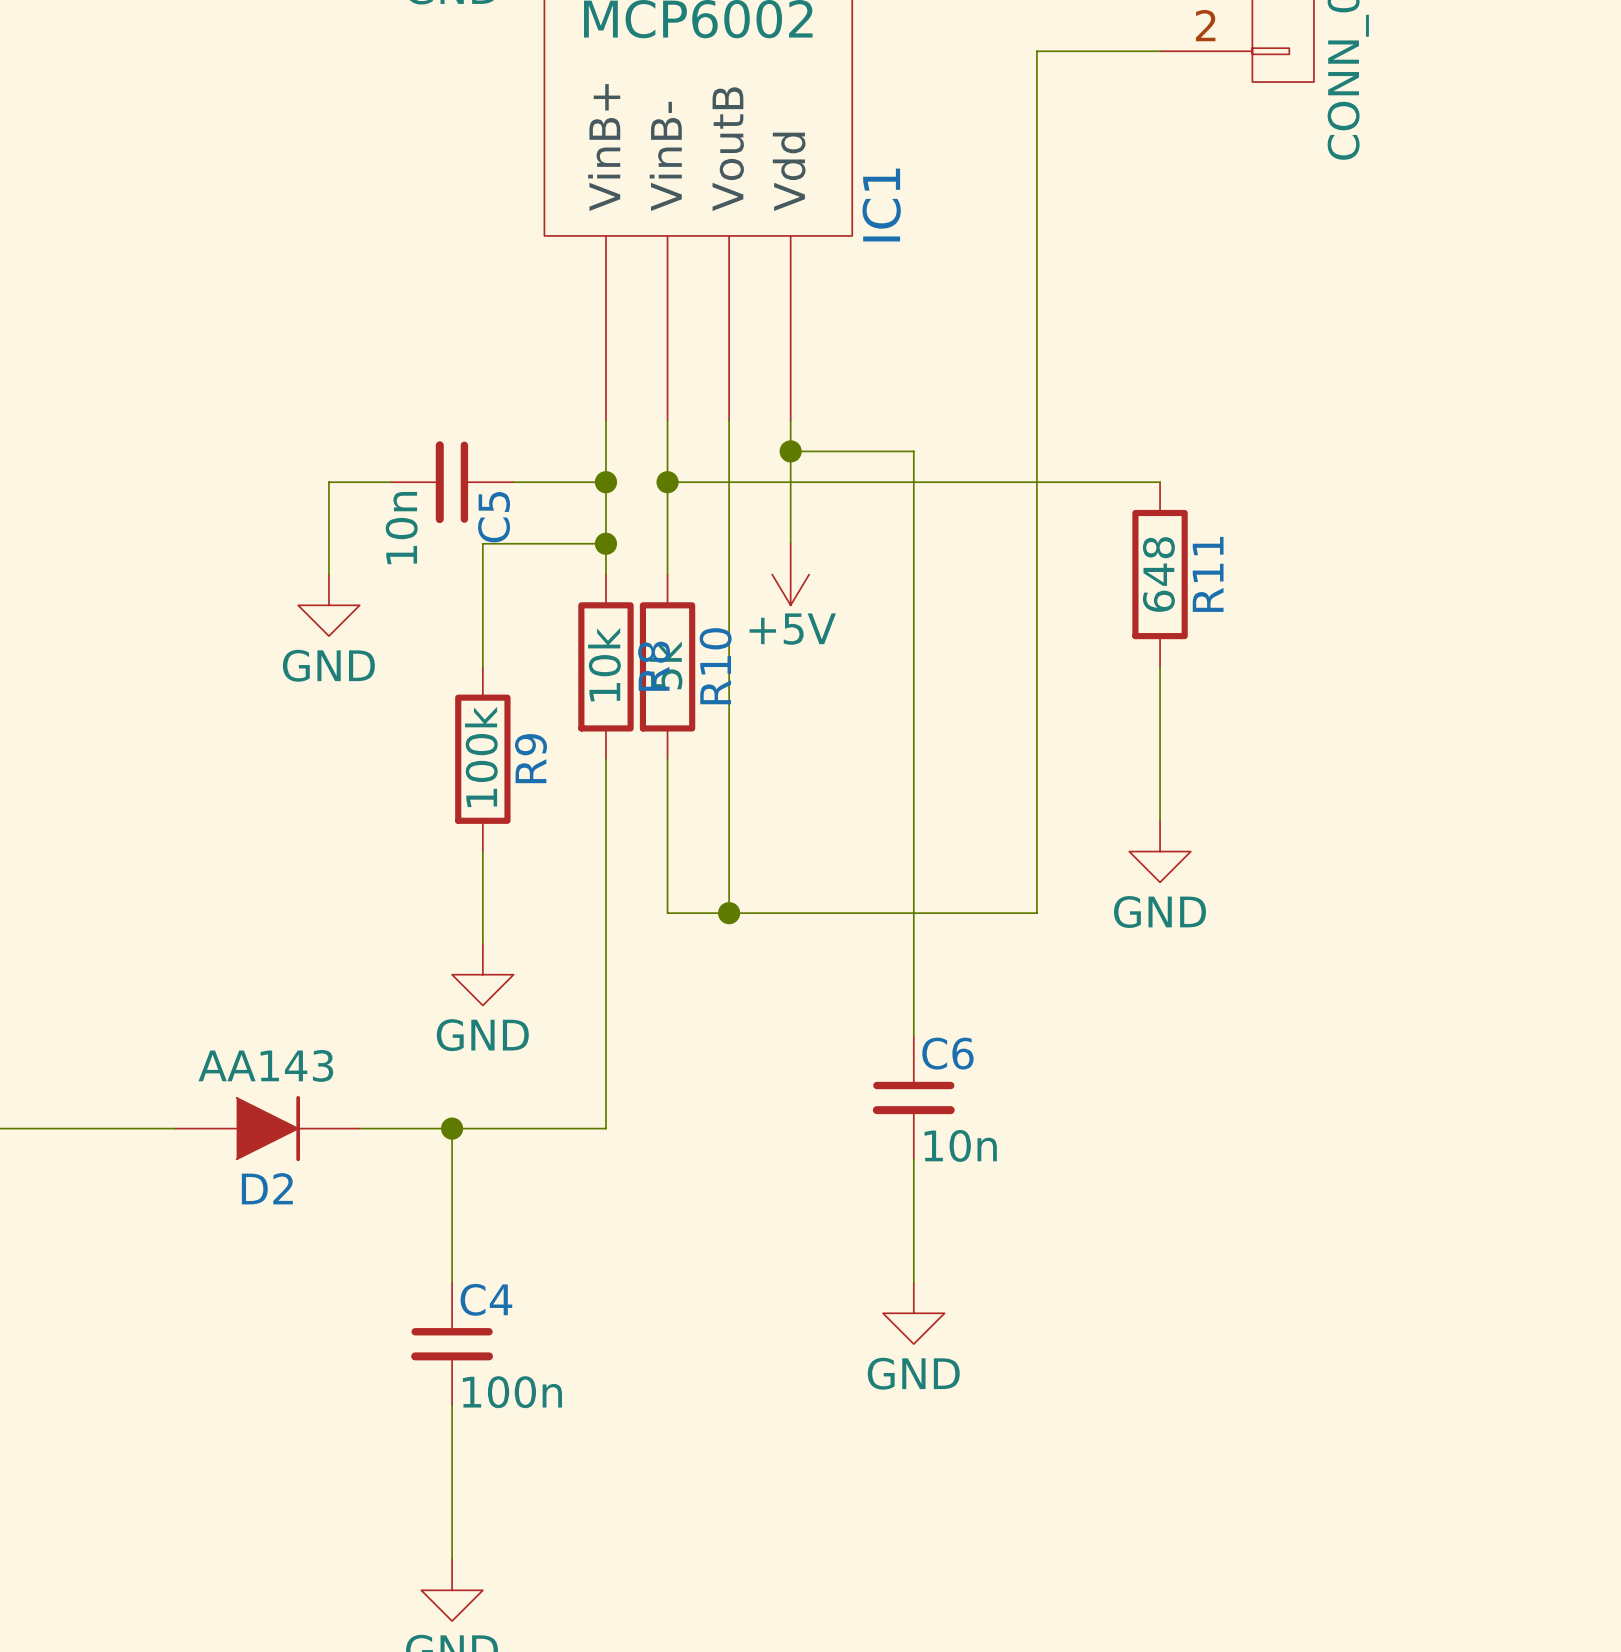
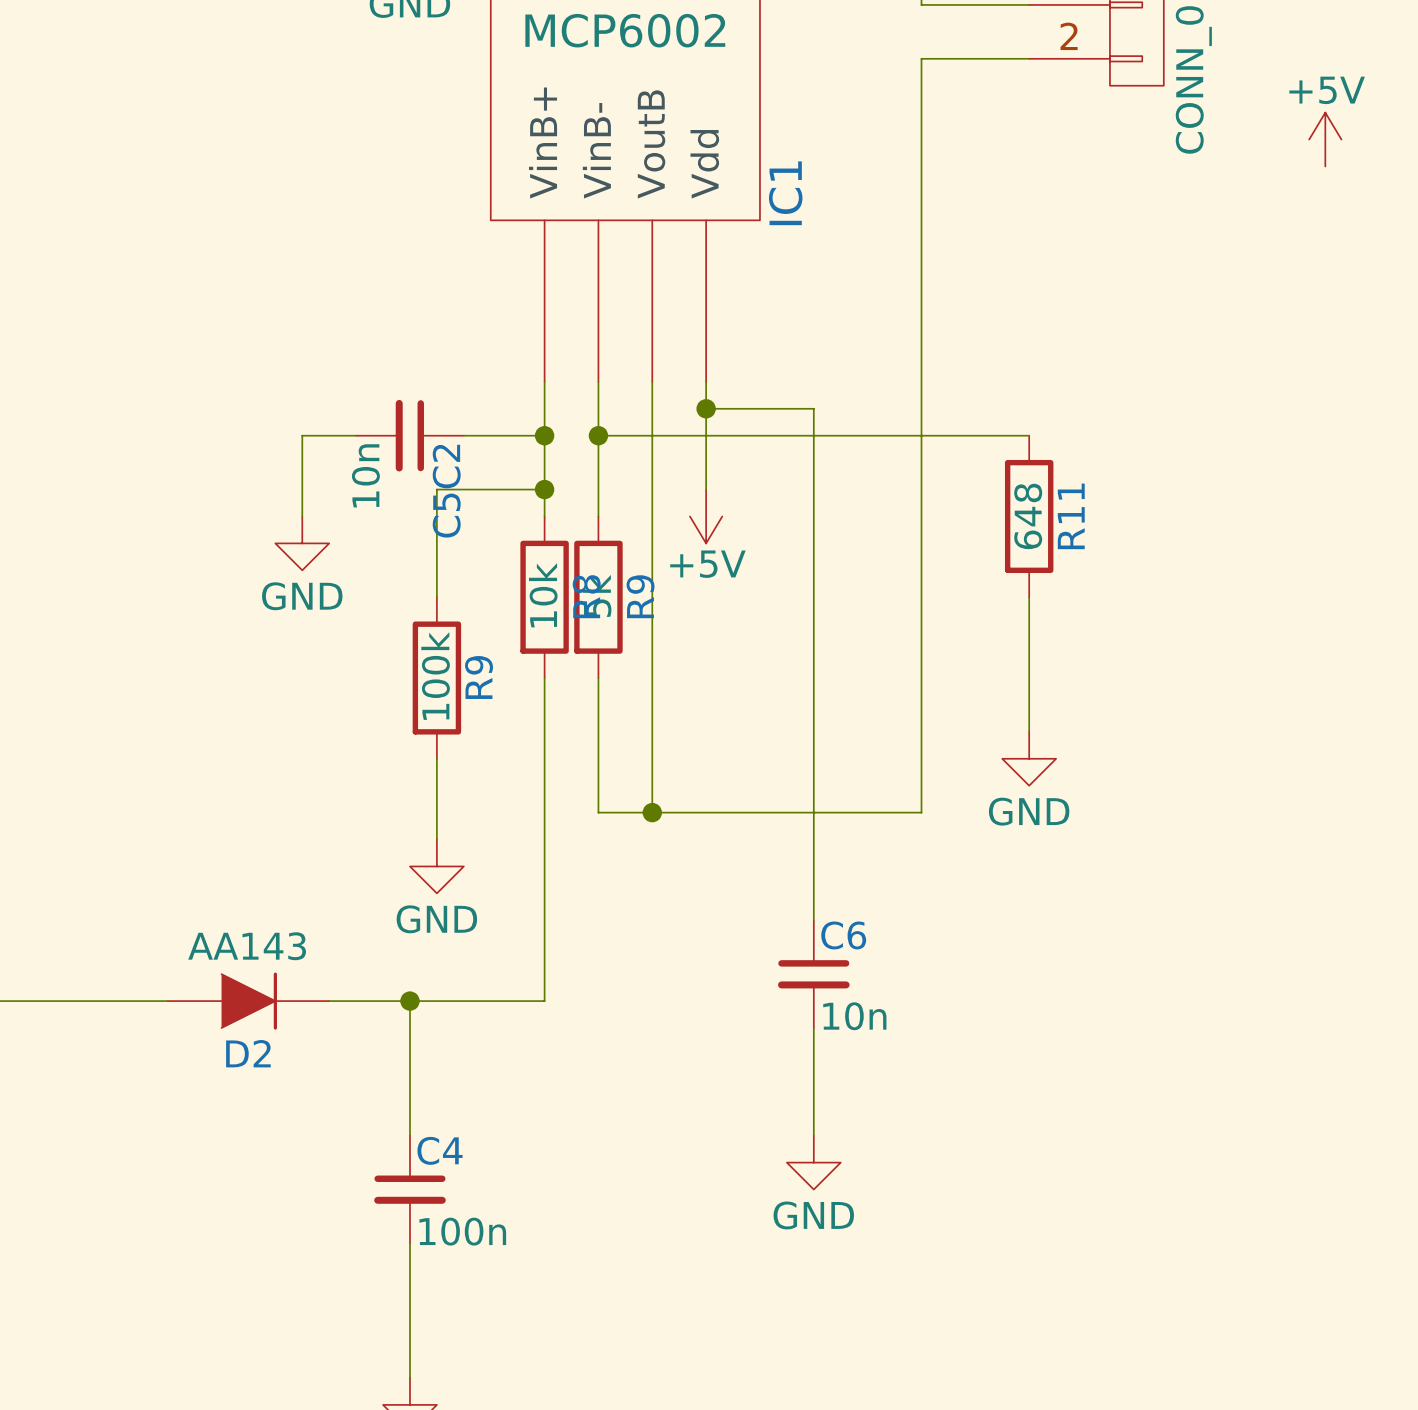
power symbol: none -> +5V (1325, 139)
C5 name: C5 (494, 517) -> C5C2 (446, 491)
R10 name: R10 (715, 666) -> R9 (640, 596)

